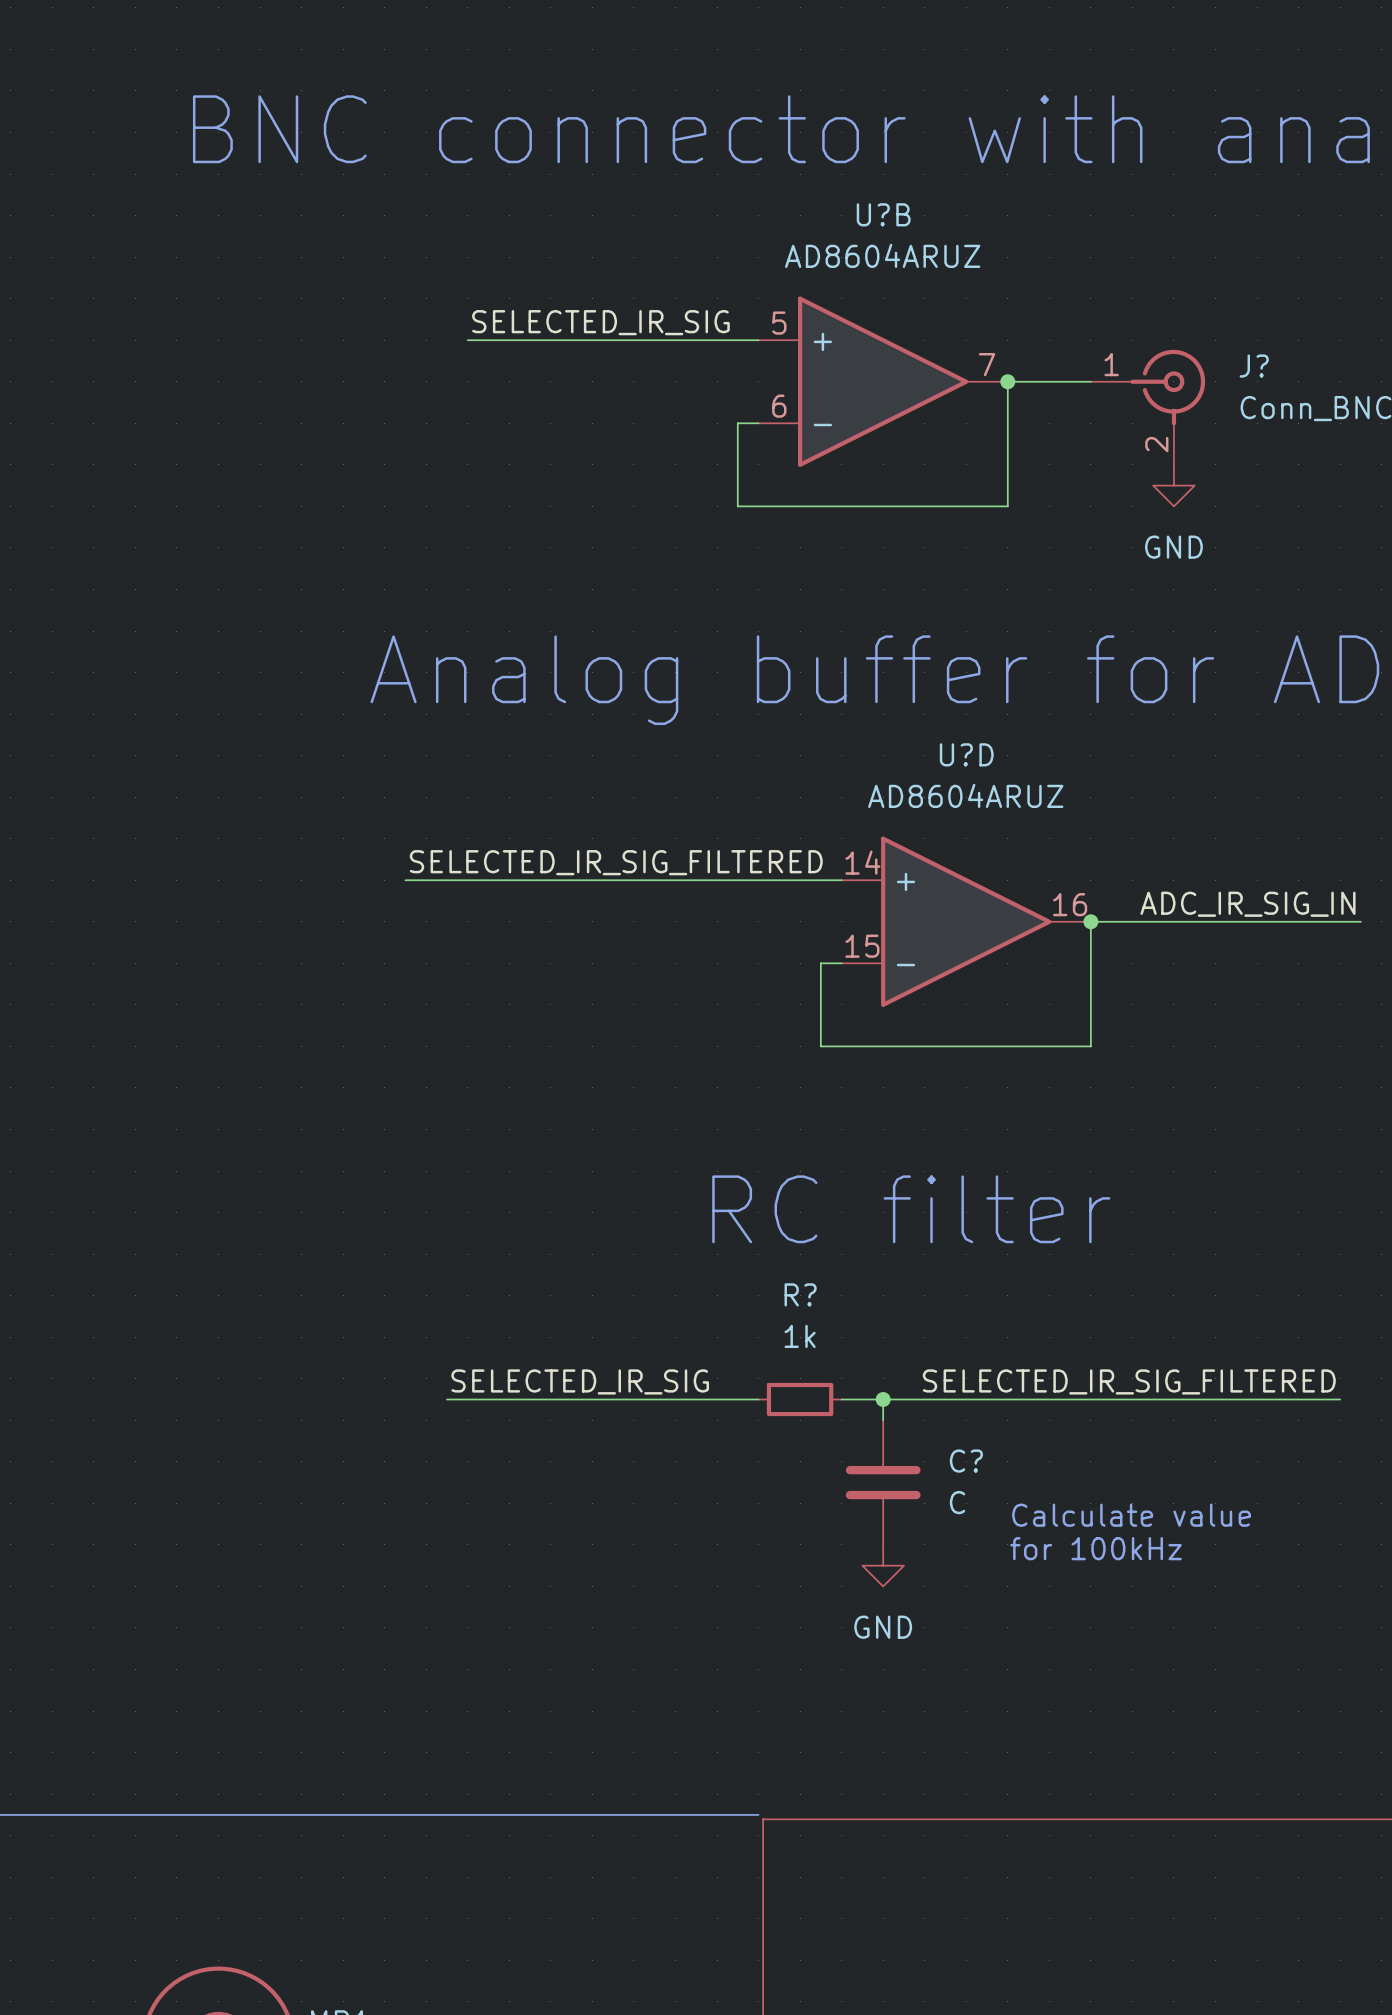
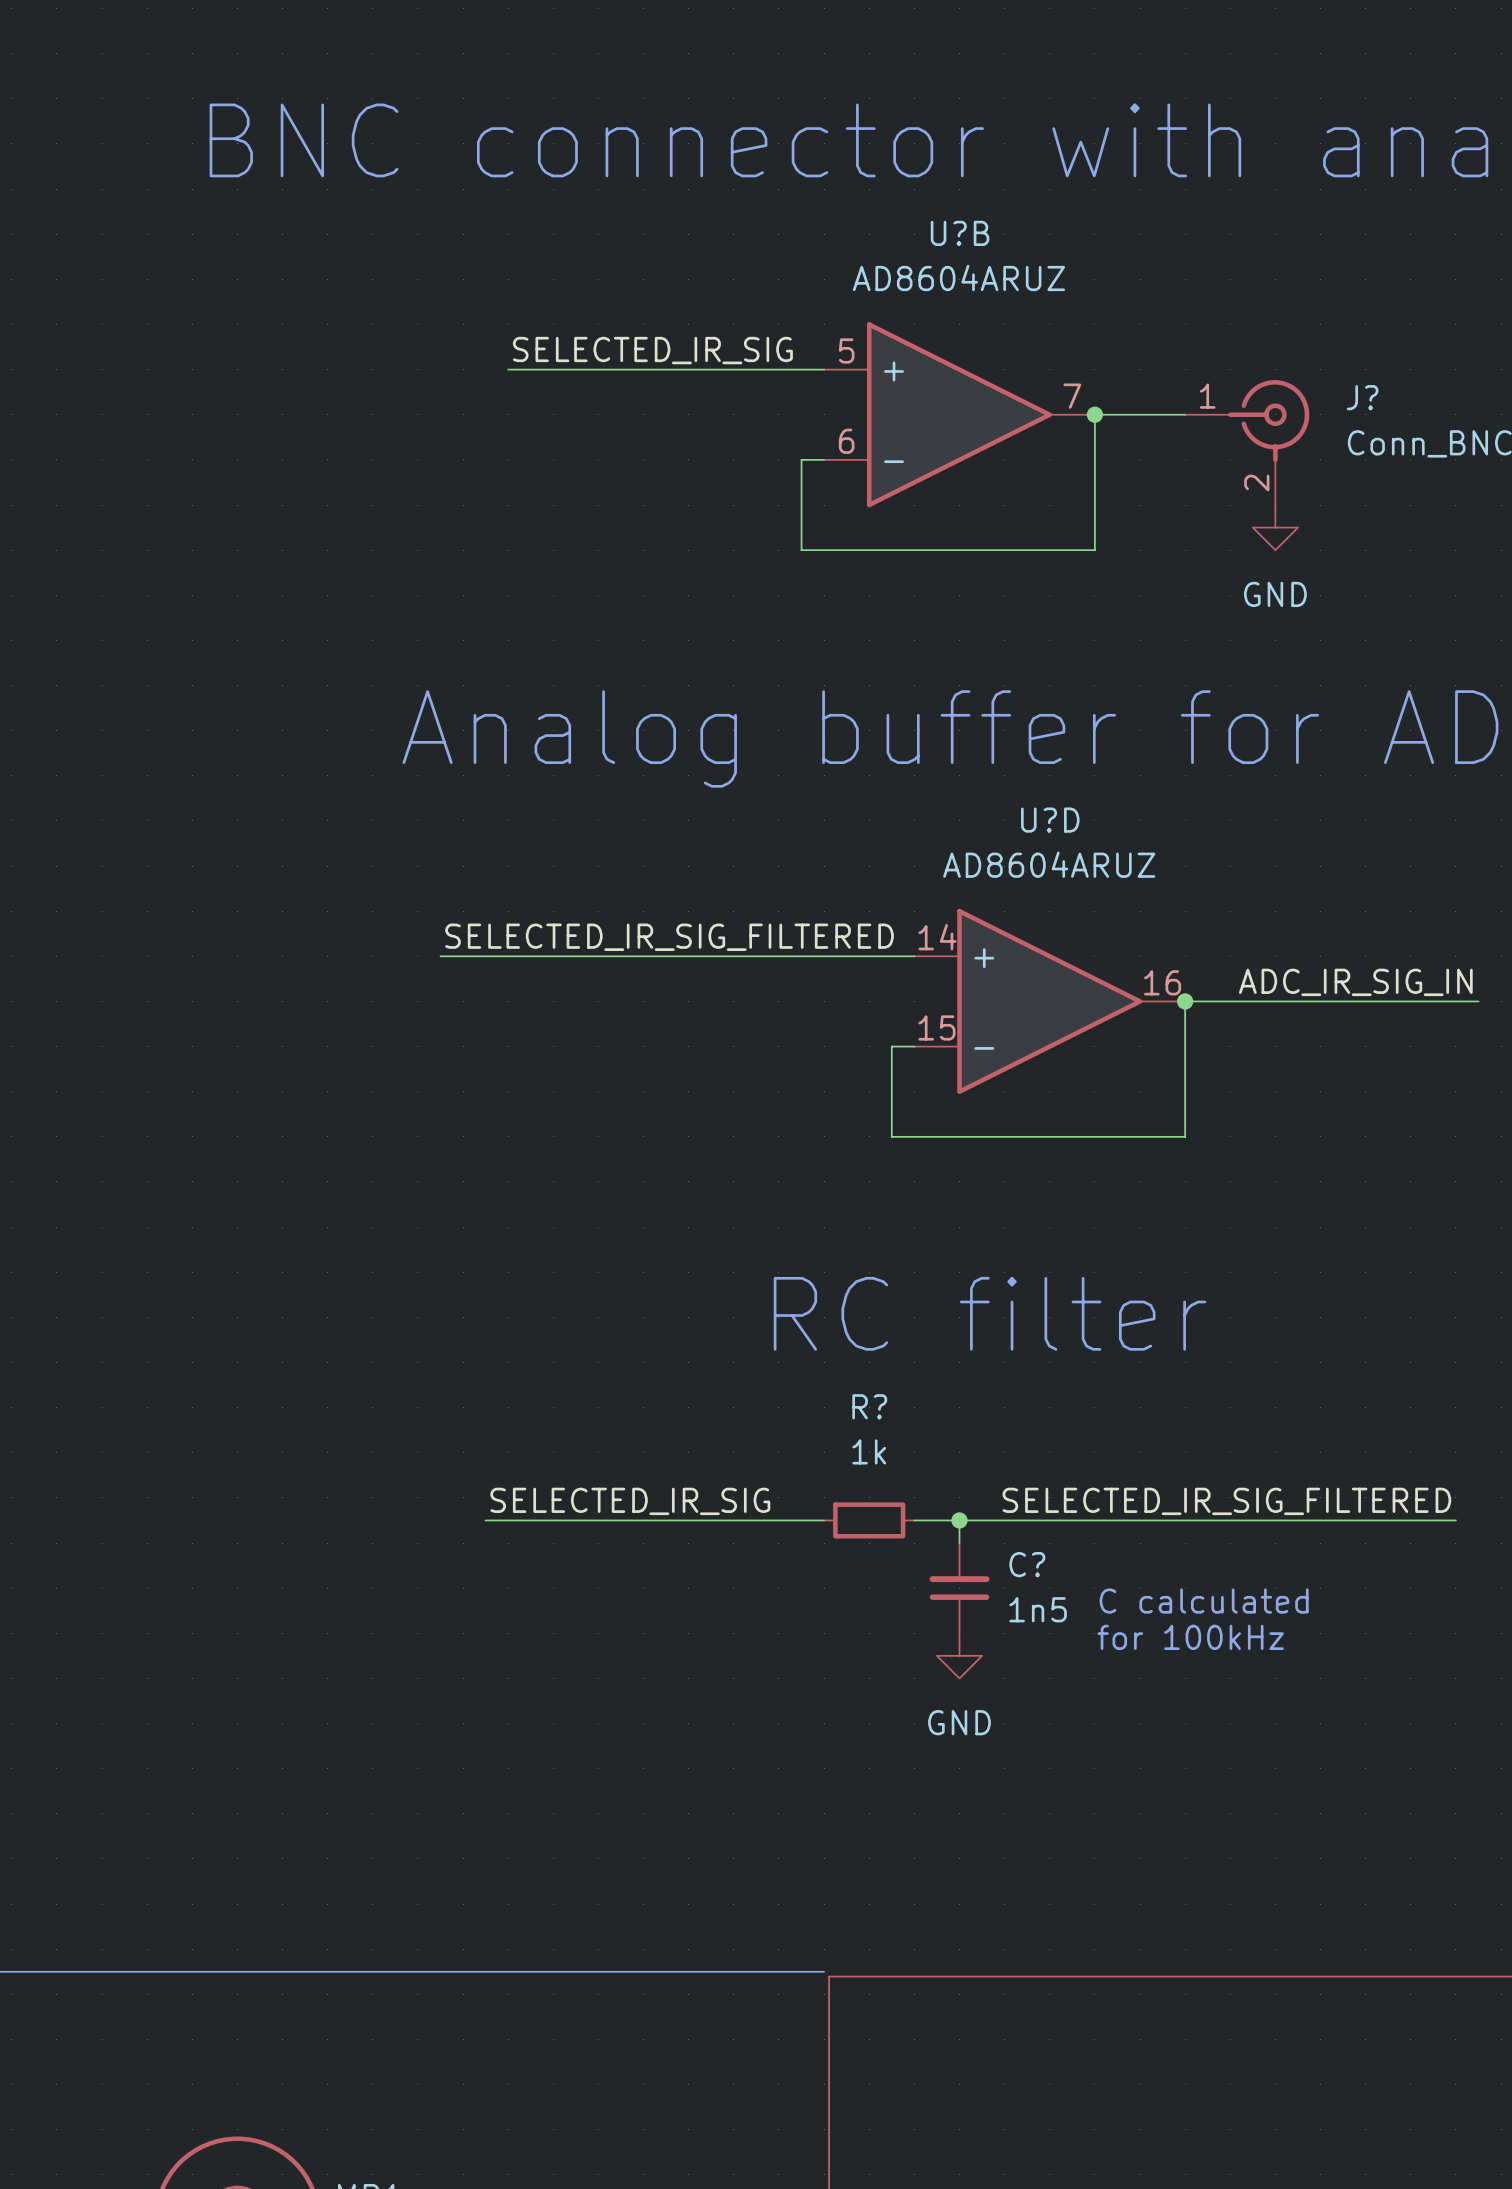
C?: none -> (959, 1588)
text: none -> C calculated (1204, 1601)
C?: C (883, 1482) -> none
text: Calculate value (1131, 1515) -> for 100kHz (1190, 1637)
text: for 100kHz (1095, 1548) -> none
power symbol position: GND (883, 1565) -> GND (959, 1655)

